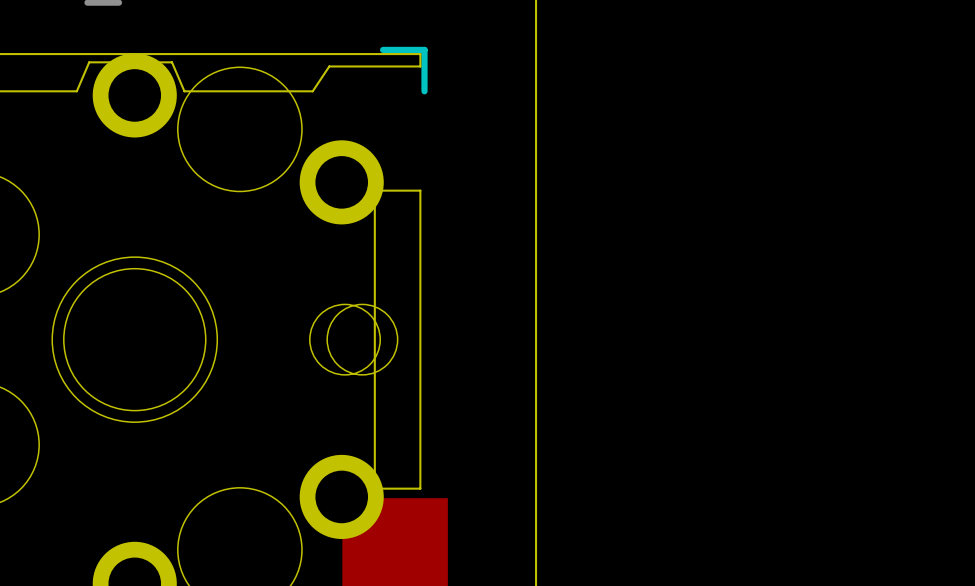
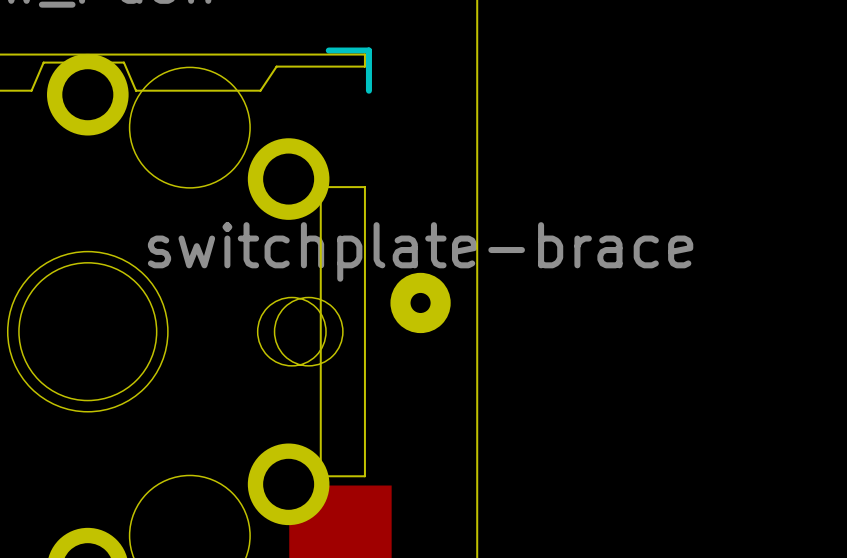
part: none -> switchplate-brace (420, 302)

